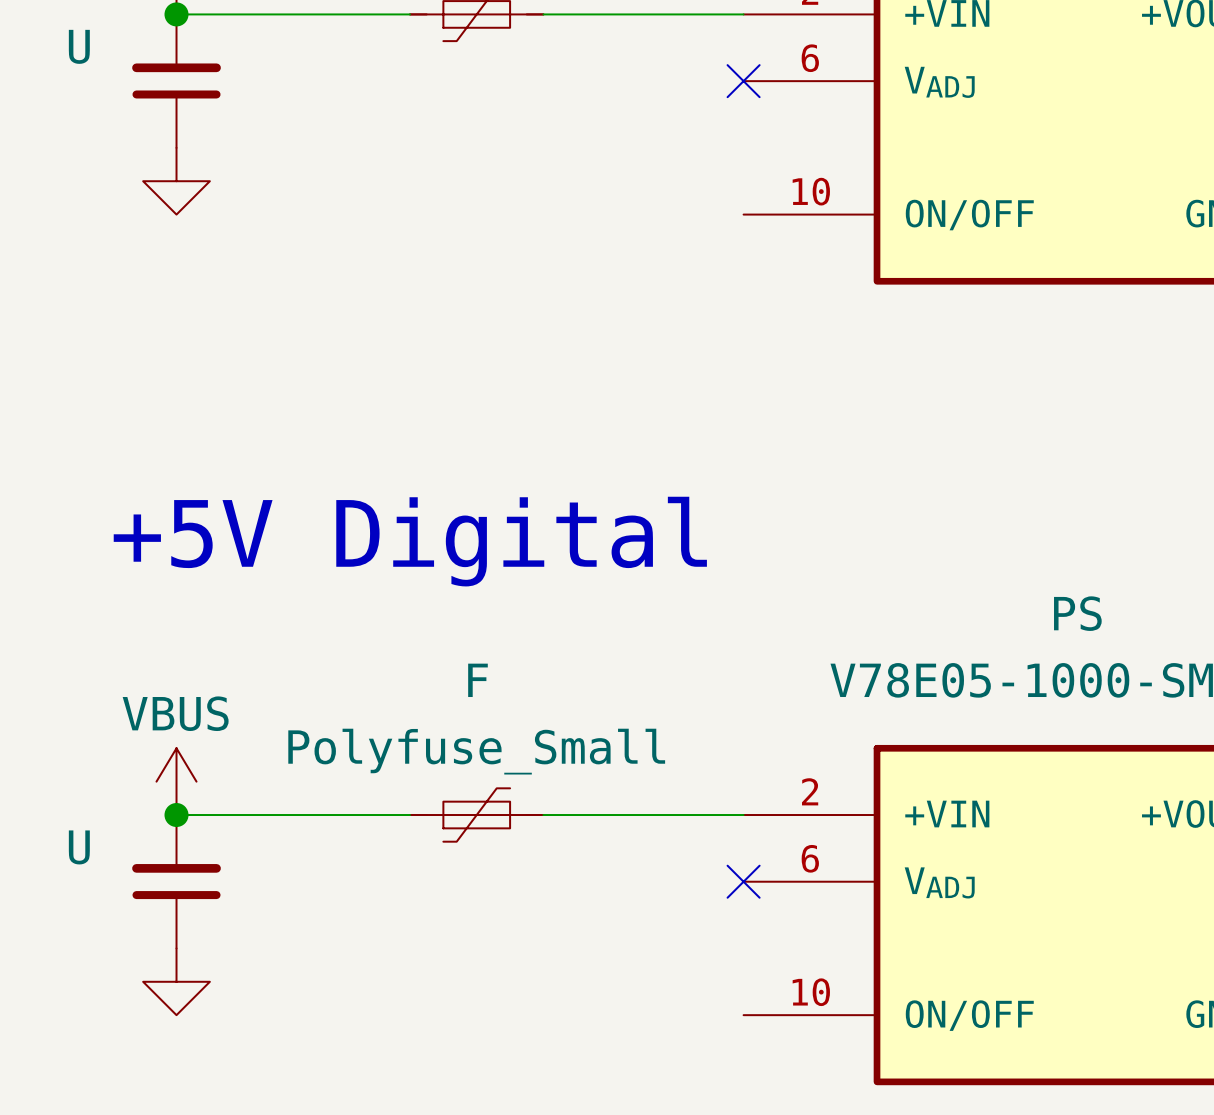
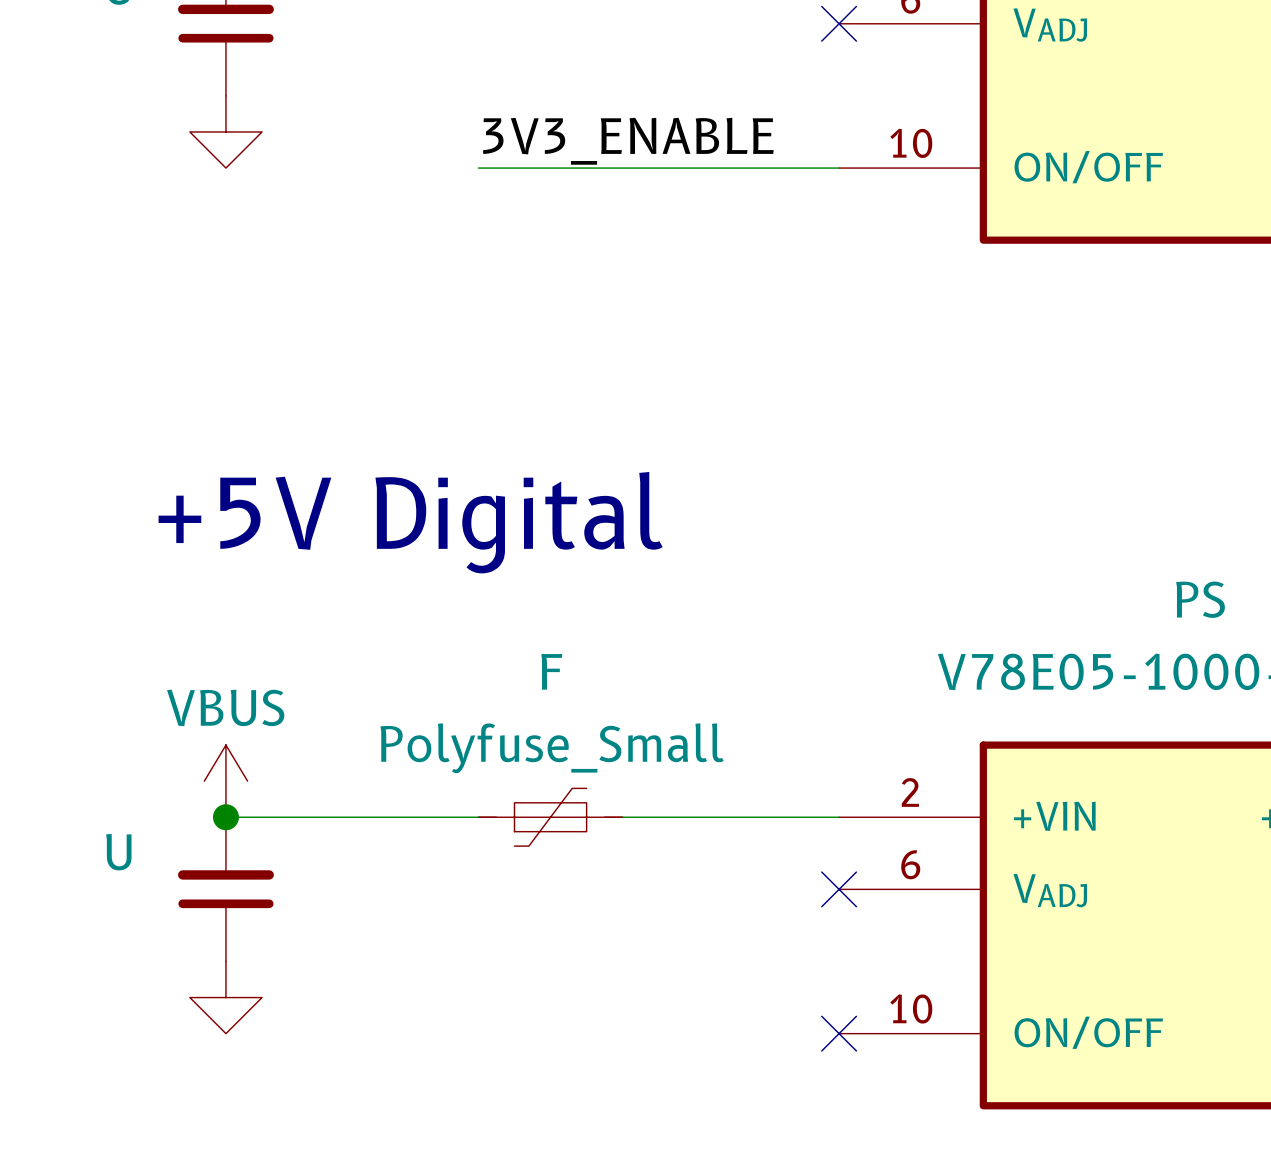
label: none -> 3V3_ENABLE (628, 141)
wire: none -> (478, 168) (839, 168)
no-connect mark: none -> (839, 1033)

